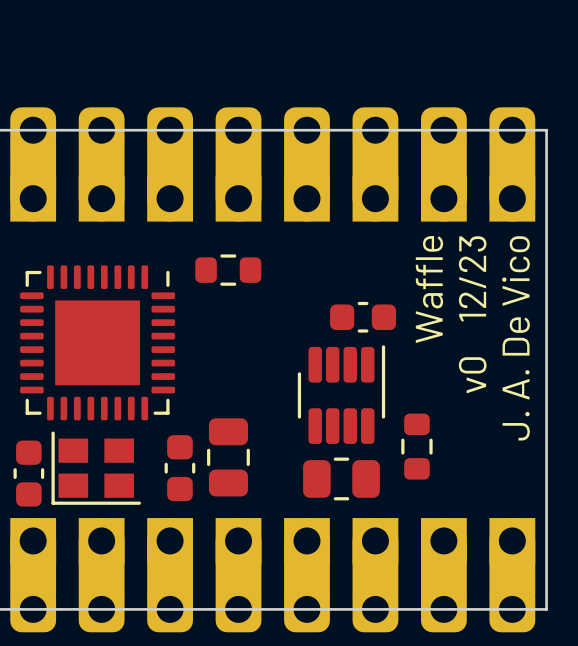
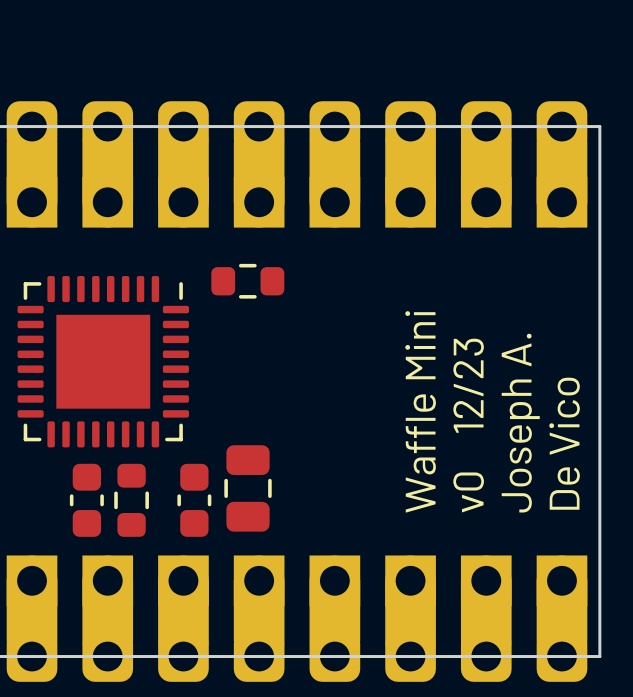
text: Waffle (429, 289) -> Waffle Mini (420, 411)
text position: v0 12/23 (472, 314) -> v0 12/23 (468, 425)
part: (363, 317) -> none
text: J. A. De Vico (516, 338) -> De Vico (564, 443)
part: (341, 394) -> none
text: none -> Joseph A. (520, 423)
part position: (416, 446) -> (131, 500)
part: (96, 468) -> none
part position: (28, 473) -> (86, 500)
part: (341, 478) -> none

